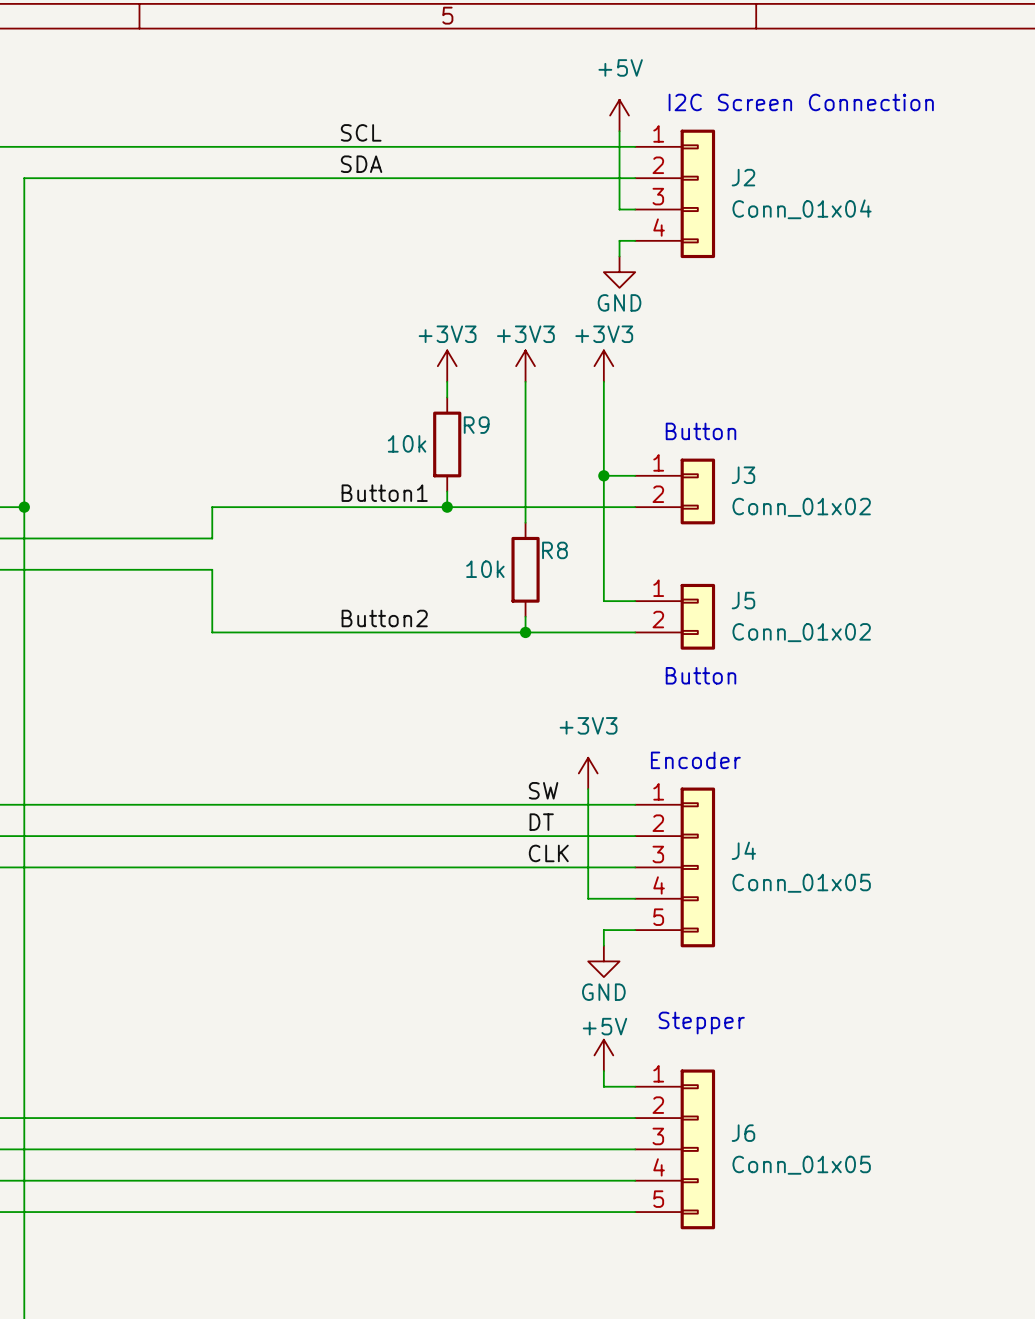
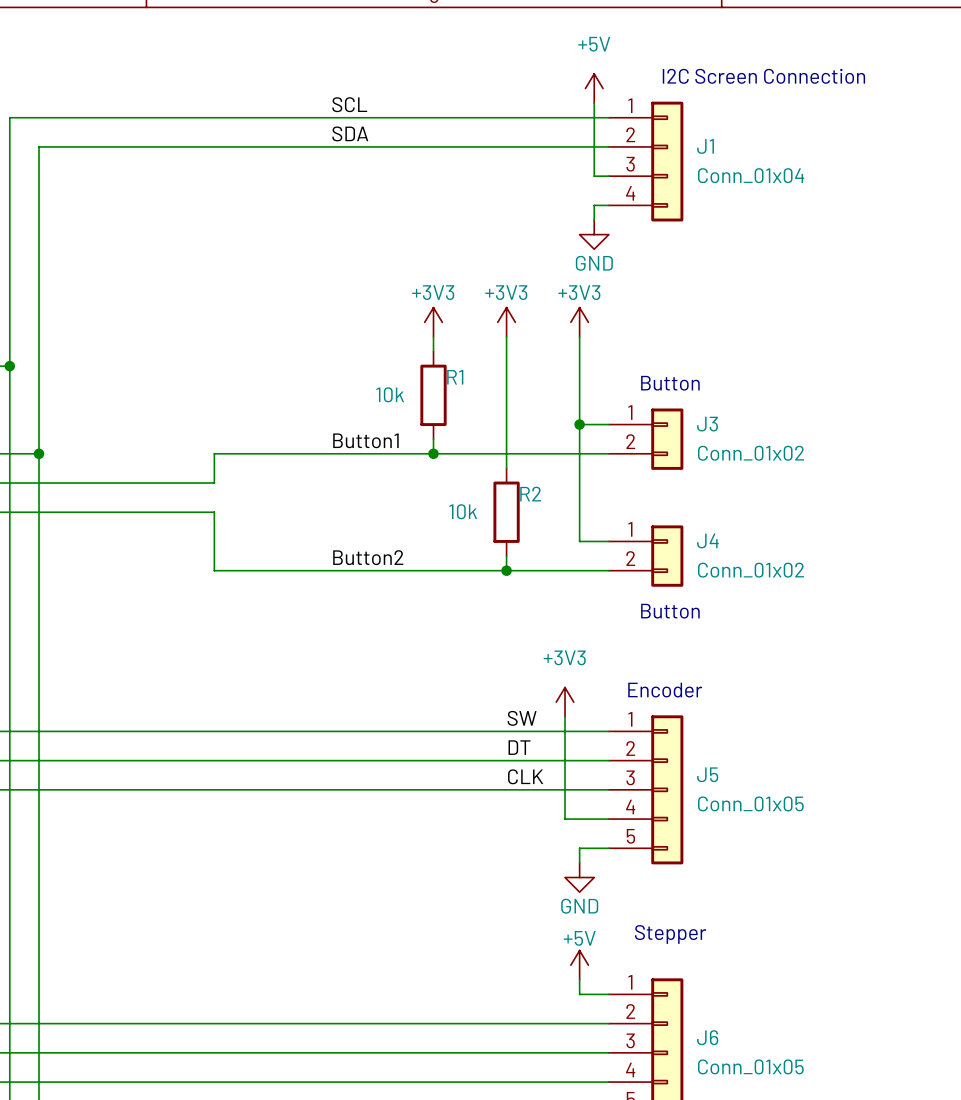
J2 name: J2 (743, 177) -> J1 (705, 146)
R9 name: R9 (476, 425) -> R1 (455, 377)
R8 name: R8 (554, 550) -> R2 (530, 494)
J5 name: J5 (743, 600) -> J4 (707, 540)
J4 name: J4 (743, 850) -> J5 (707, 774)

